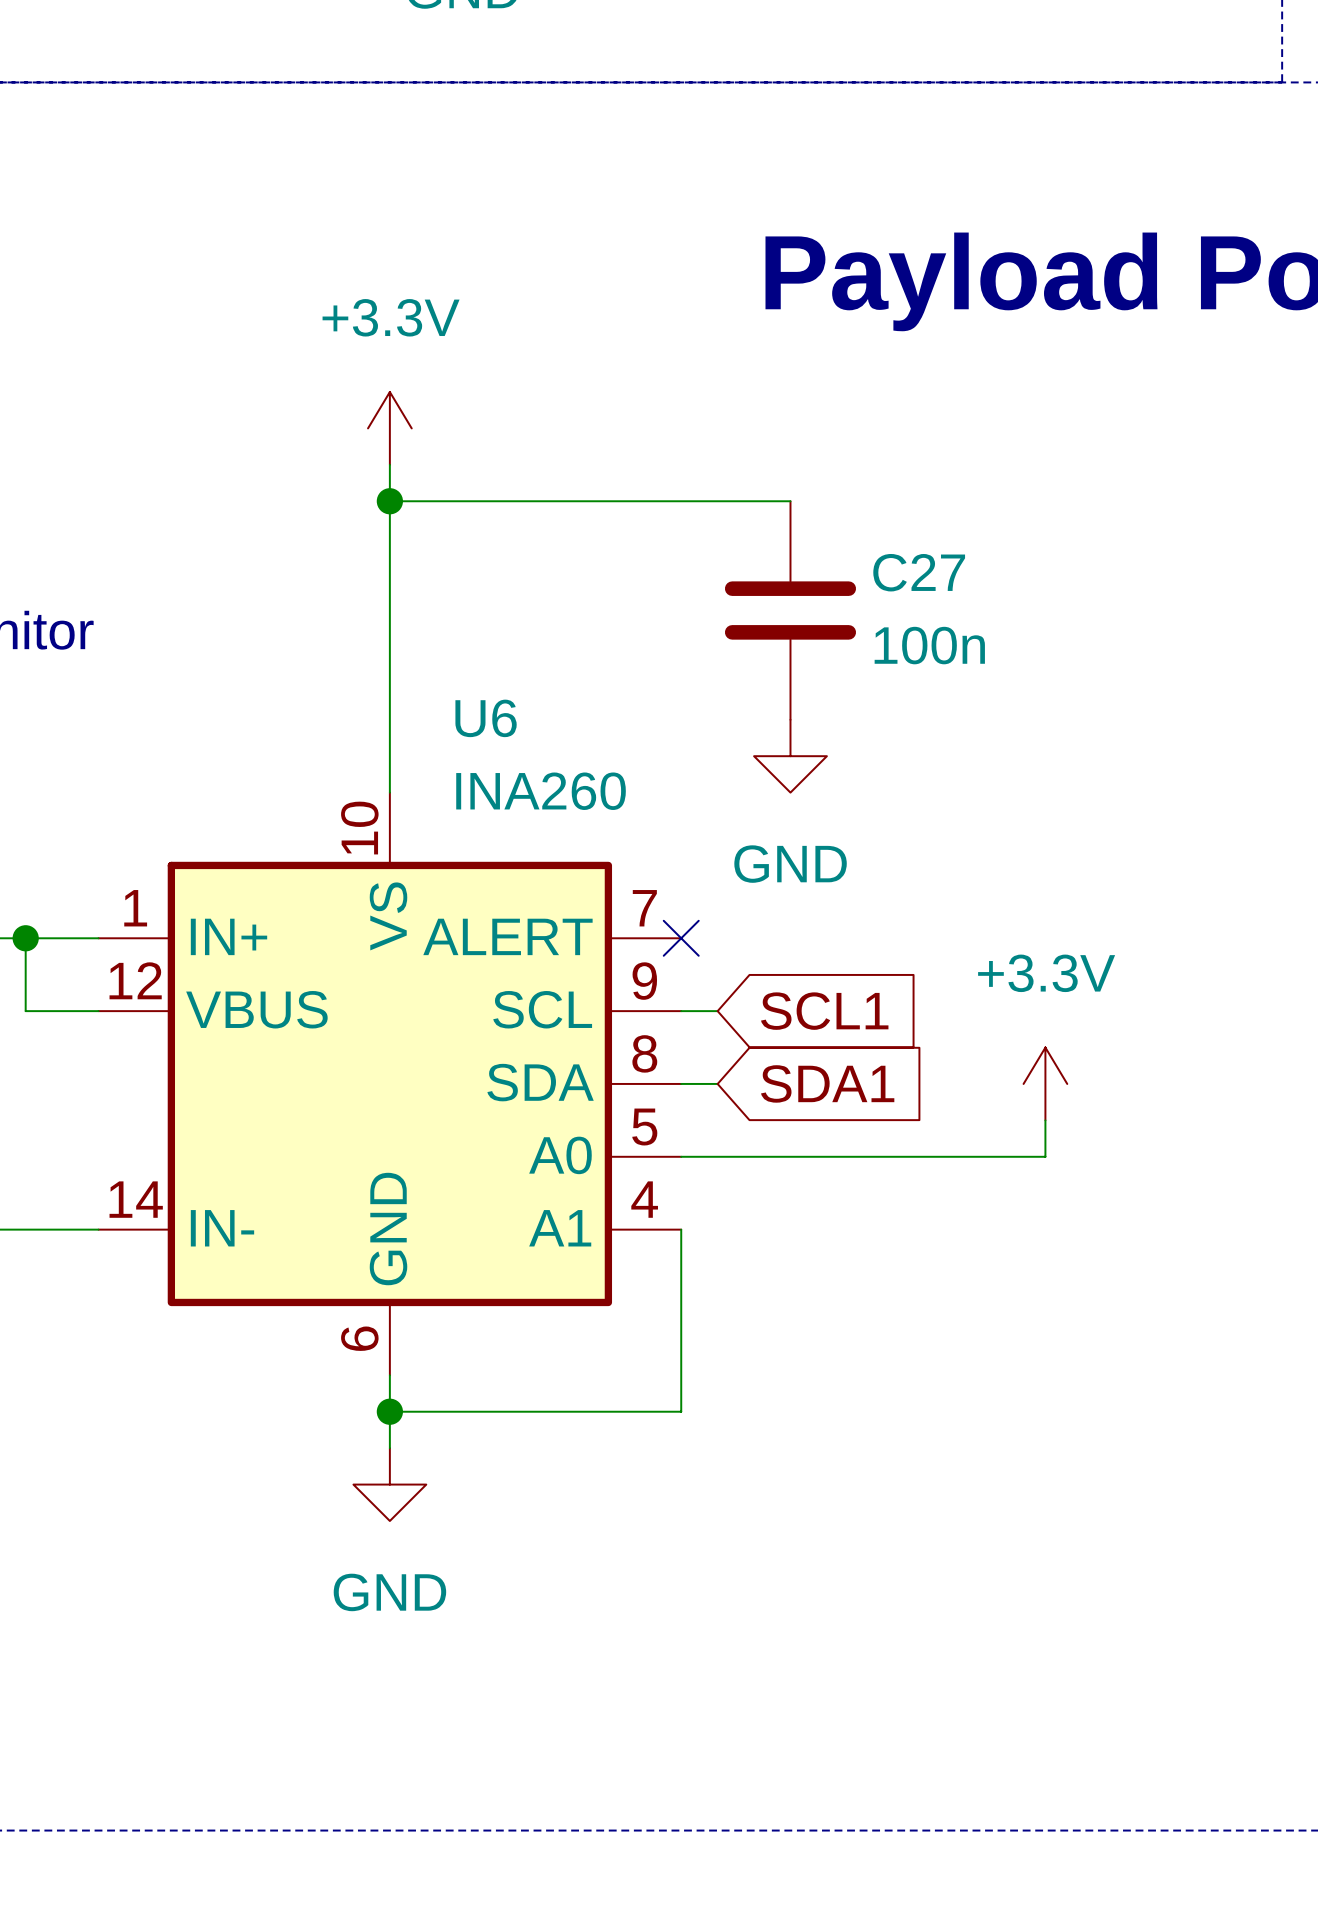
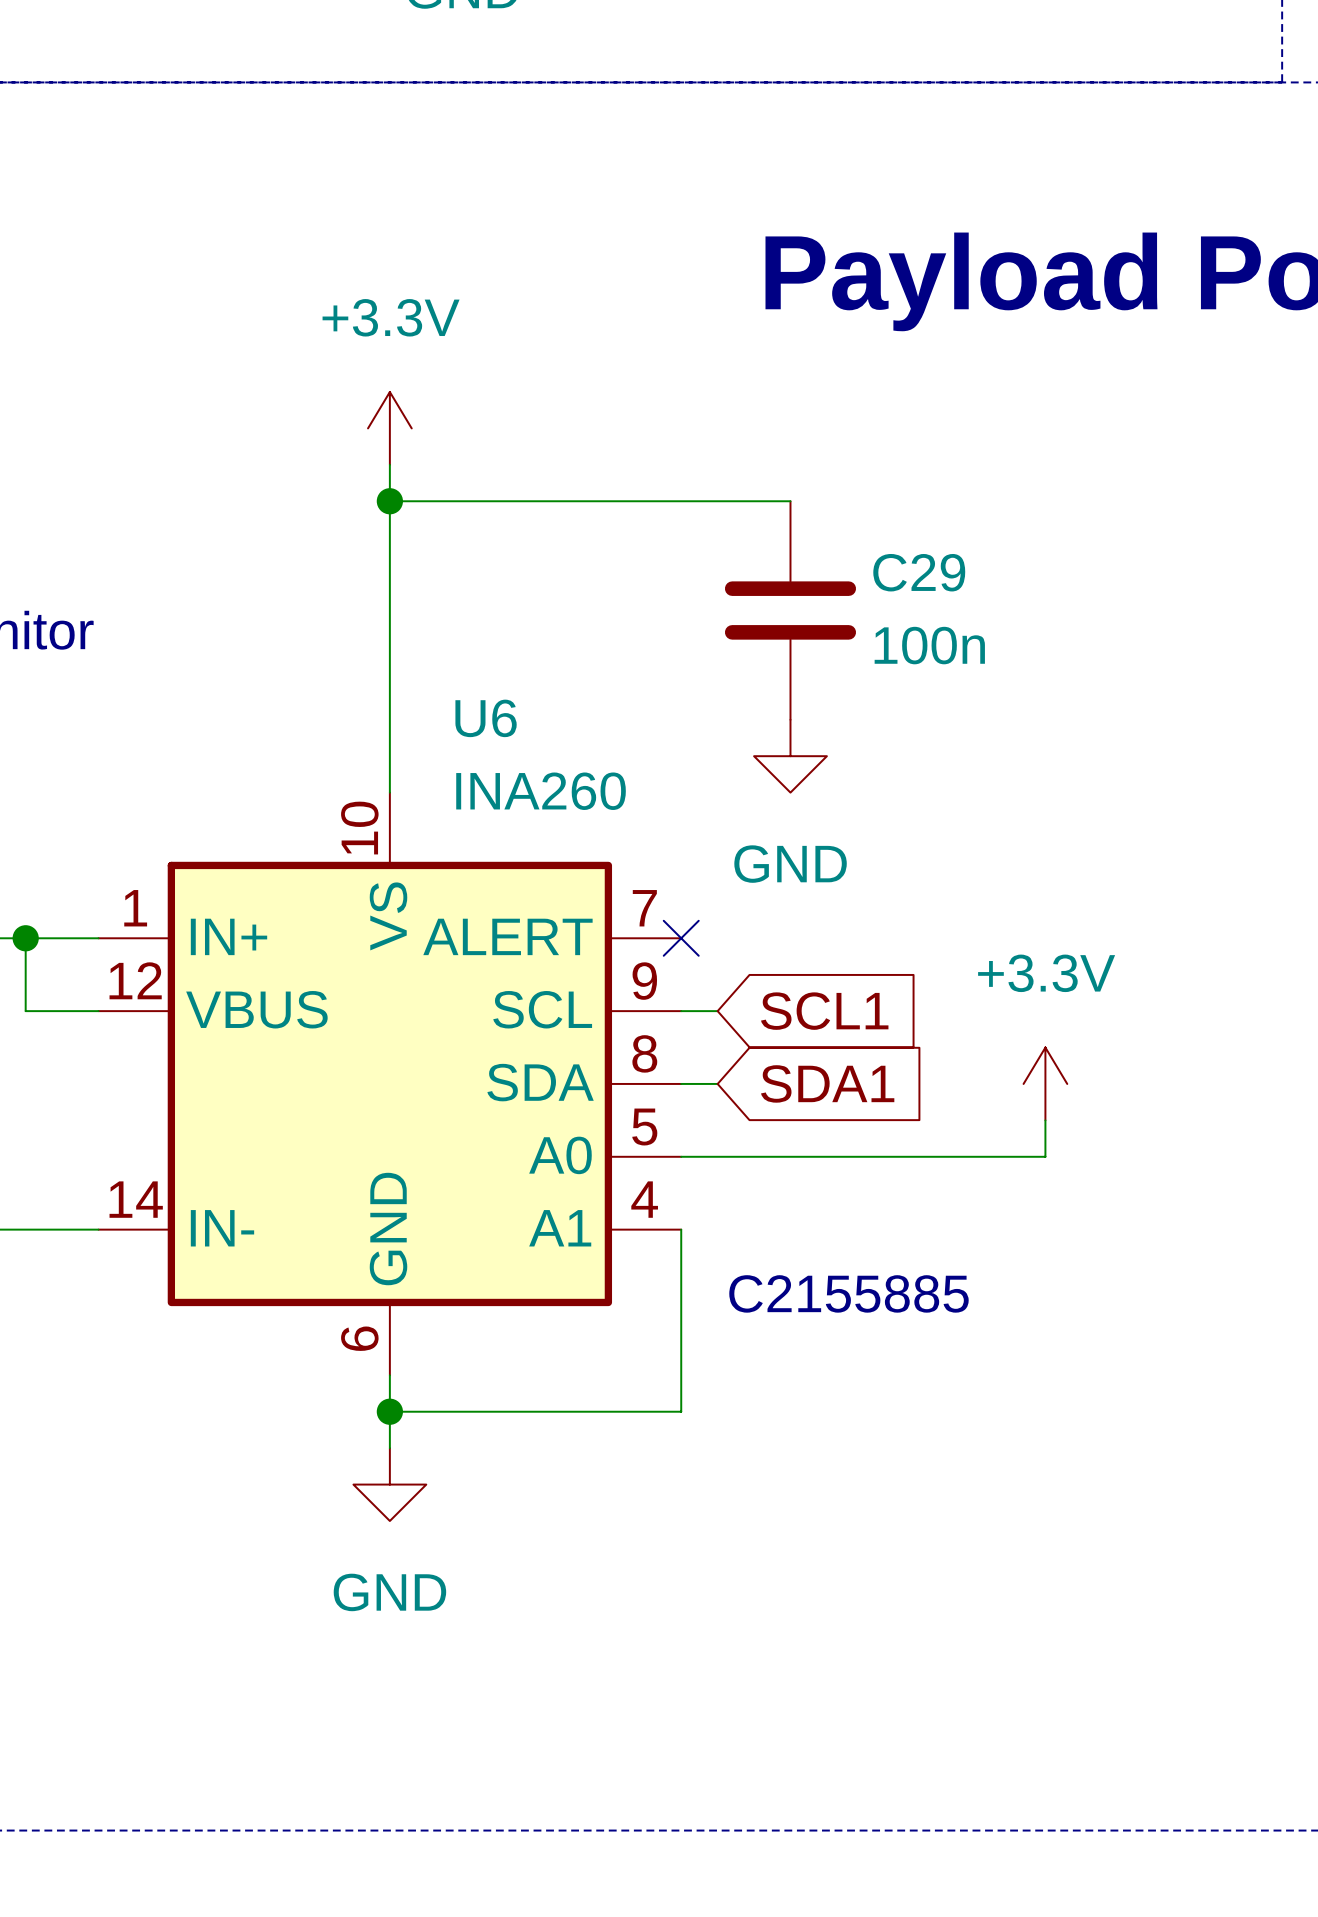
C27 name: C27 (919, 572) -> C29 (919, 572)
text: none -> C2155885 (848, 1293)

